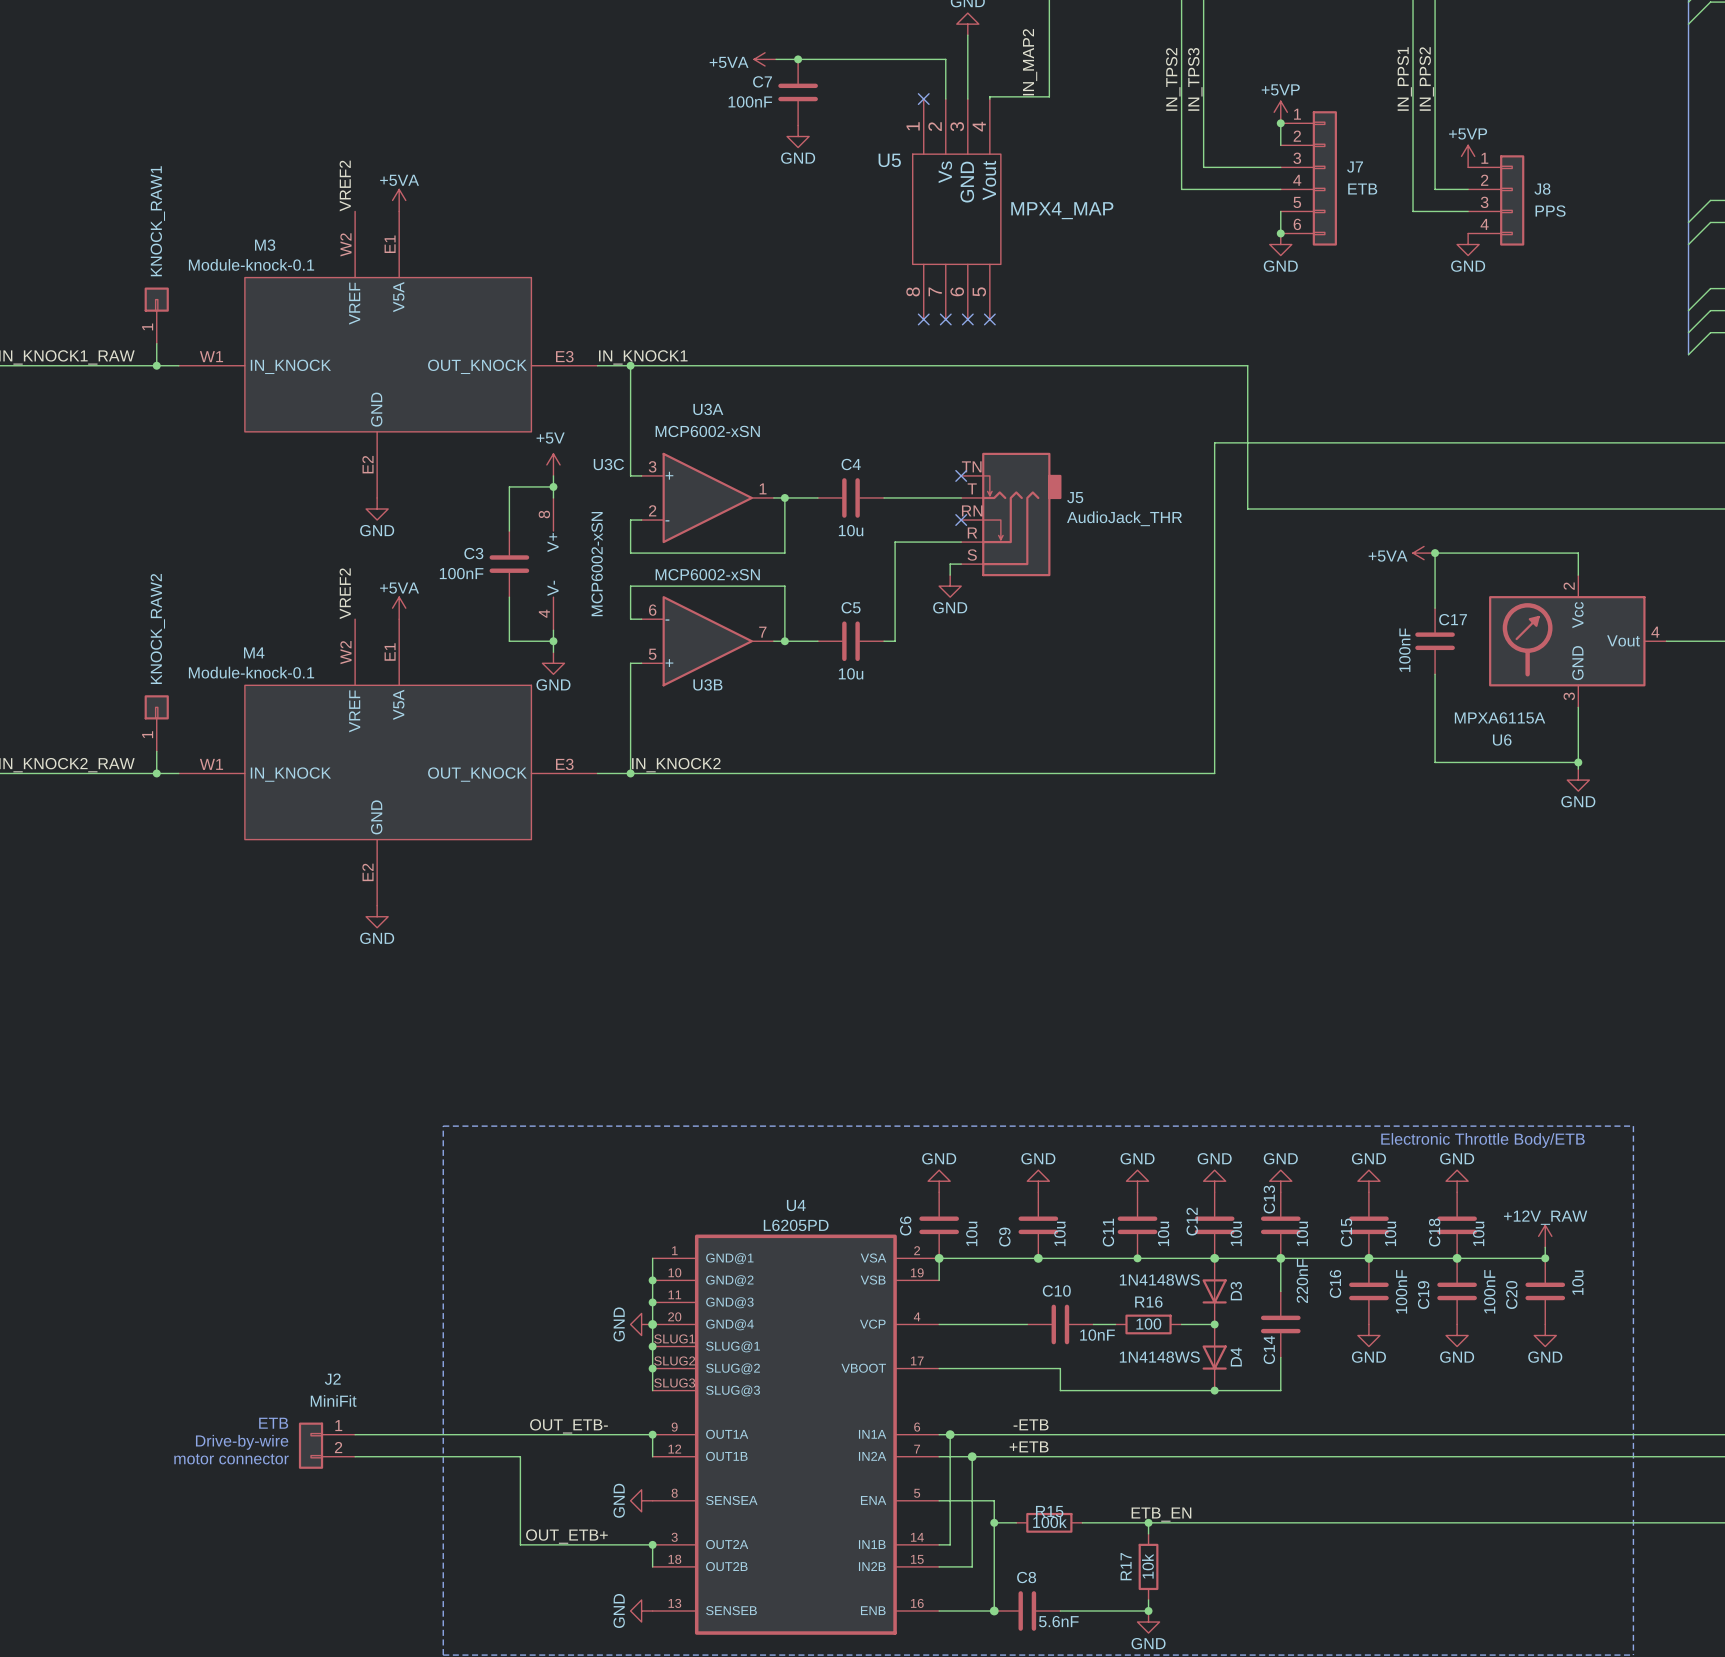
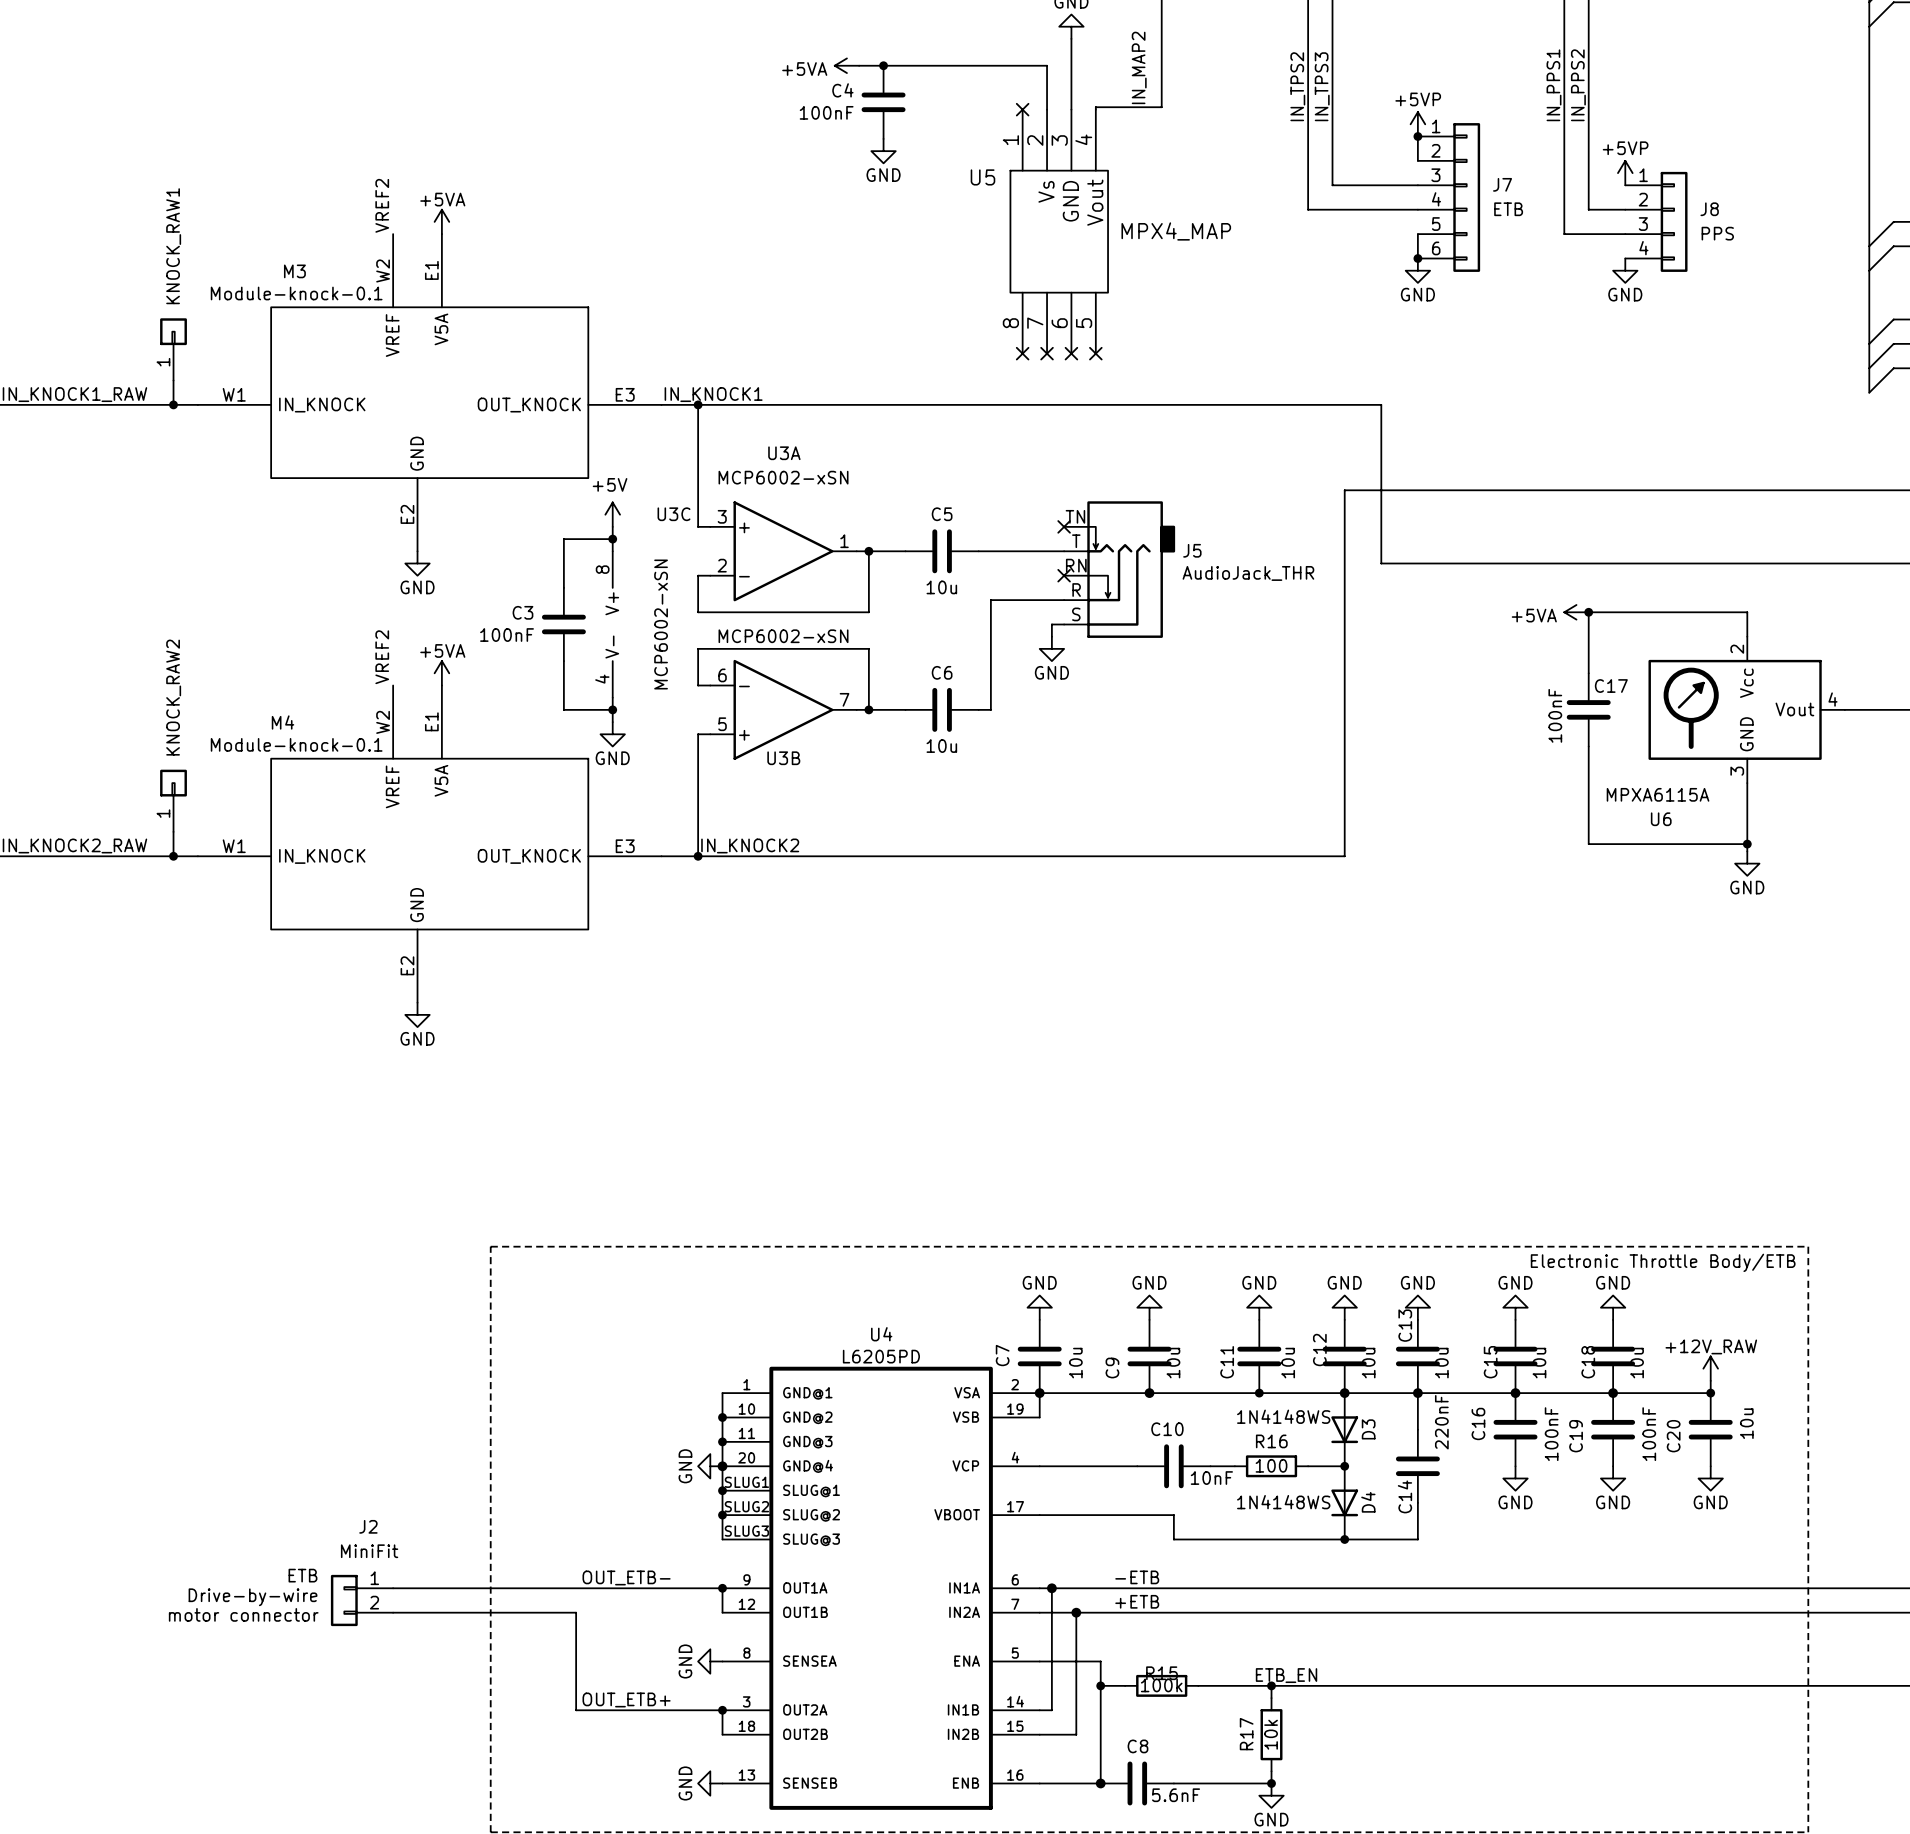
C7 name: C7 (762, 81) -> C4 (842, 90)
C4 name: C4 (851, 464) -> C5 (942, 514)
C5 name: C5 (851, 607) -> C6 (942, 672)
C6 name: C6 (905, 1226) -> C7 (1002, 1355)

